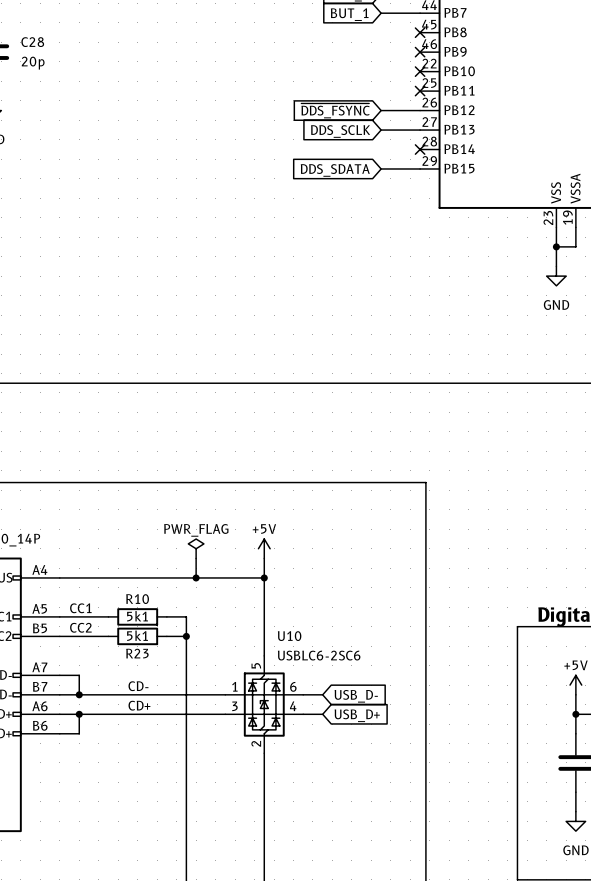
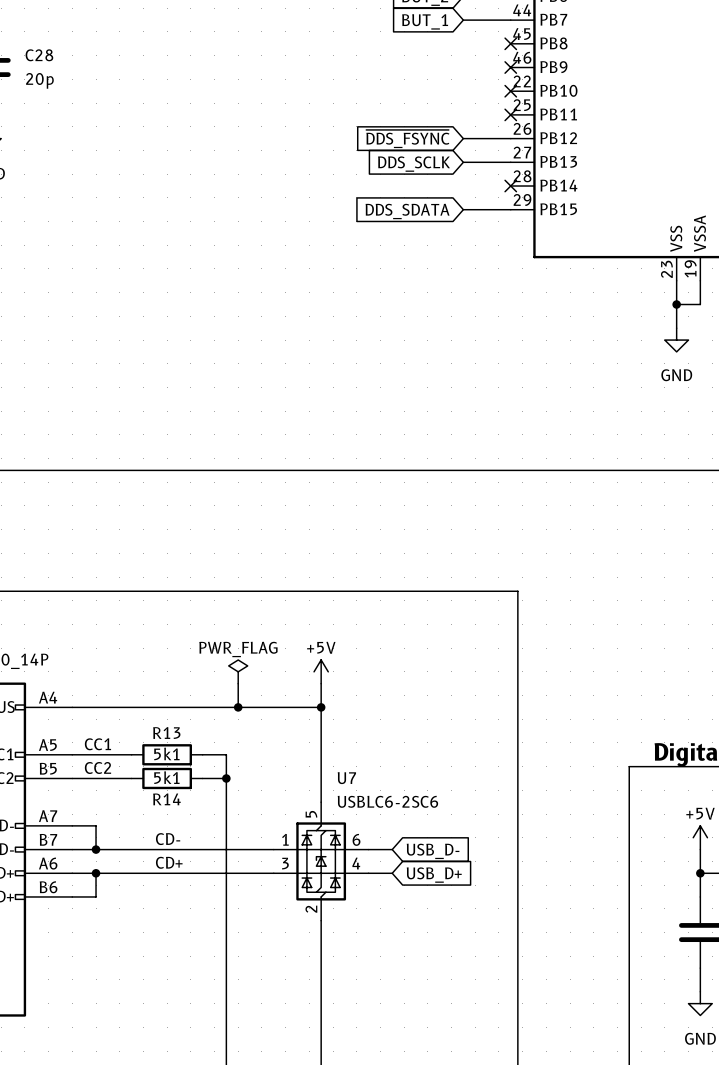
R10 name: R10 (137, 599) -> R13 (166, 733)
U10 name: U10 (289, 636) -> U7 (346, 778)
R23 name: R23 (137, 653) -> R14 (166, 799)

